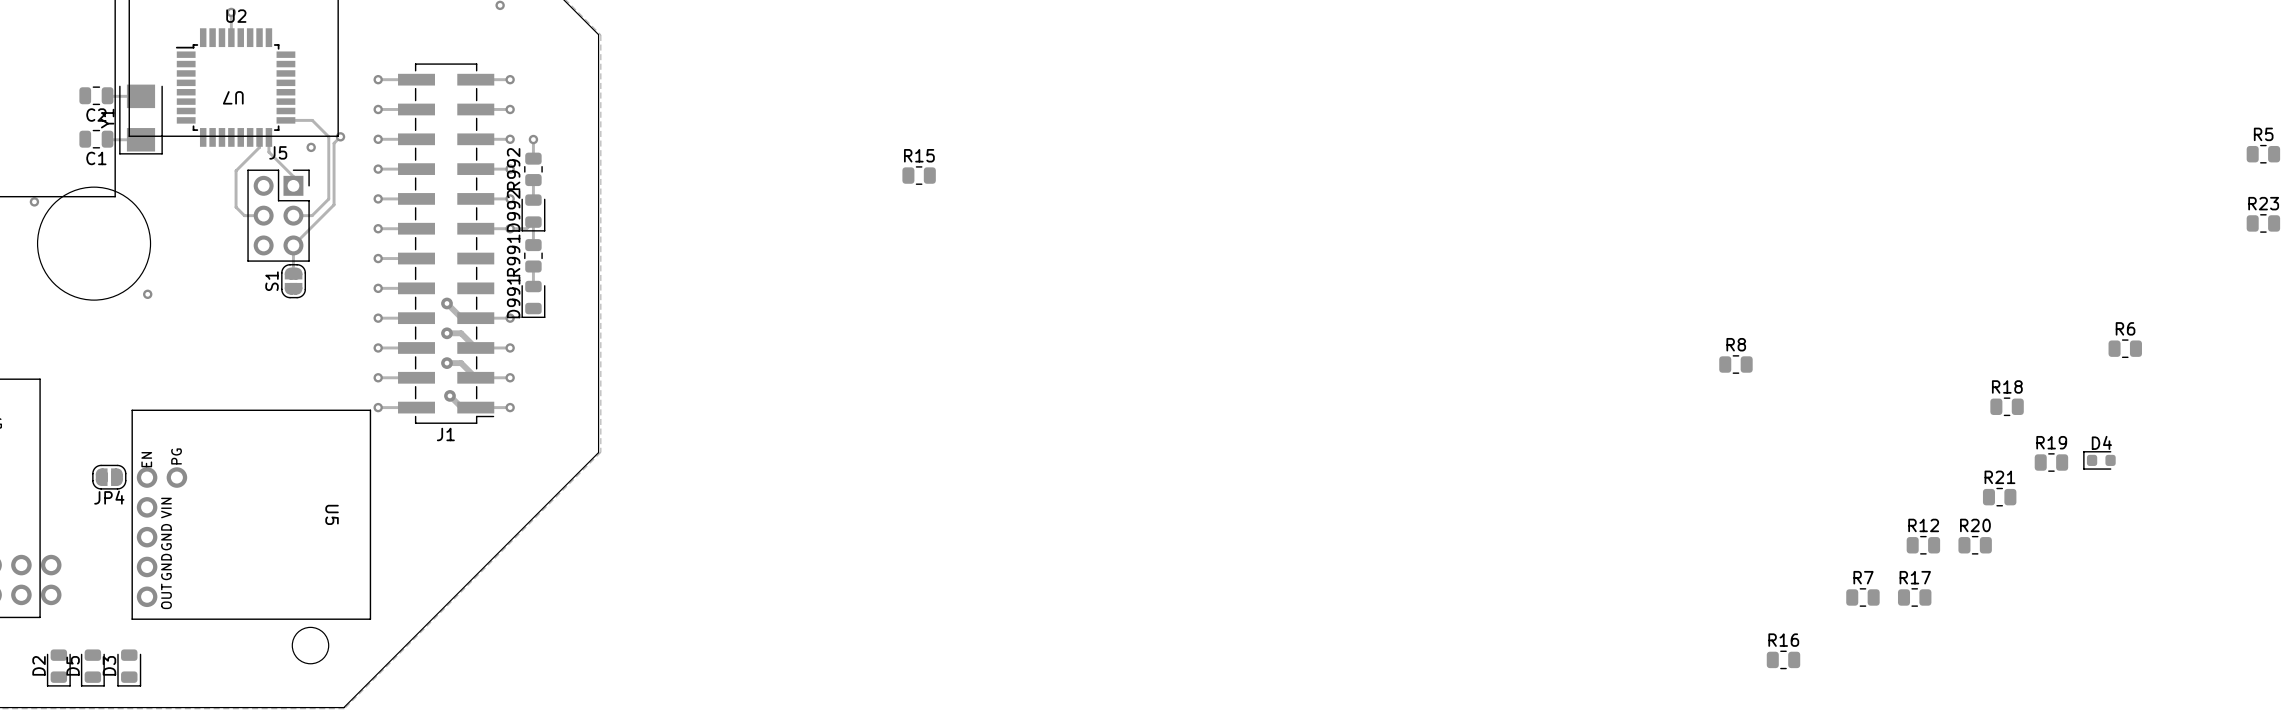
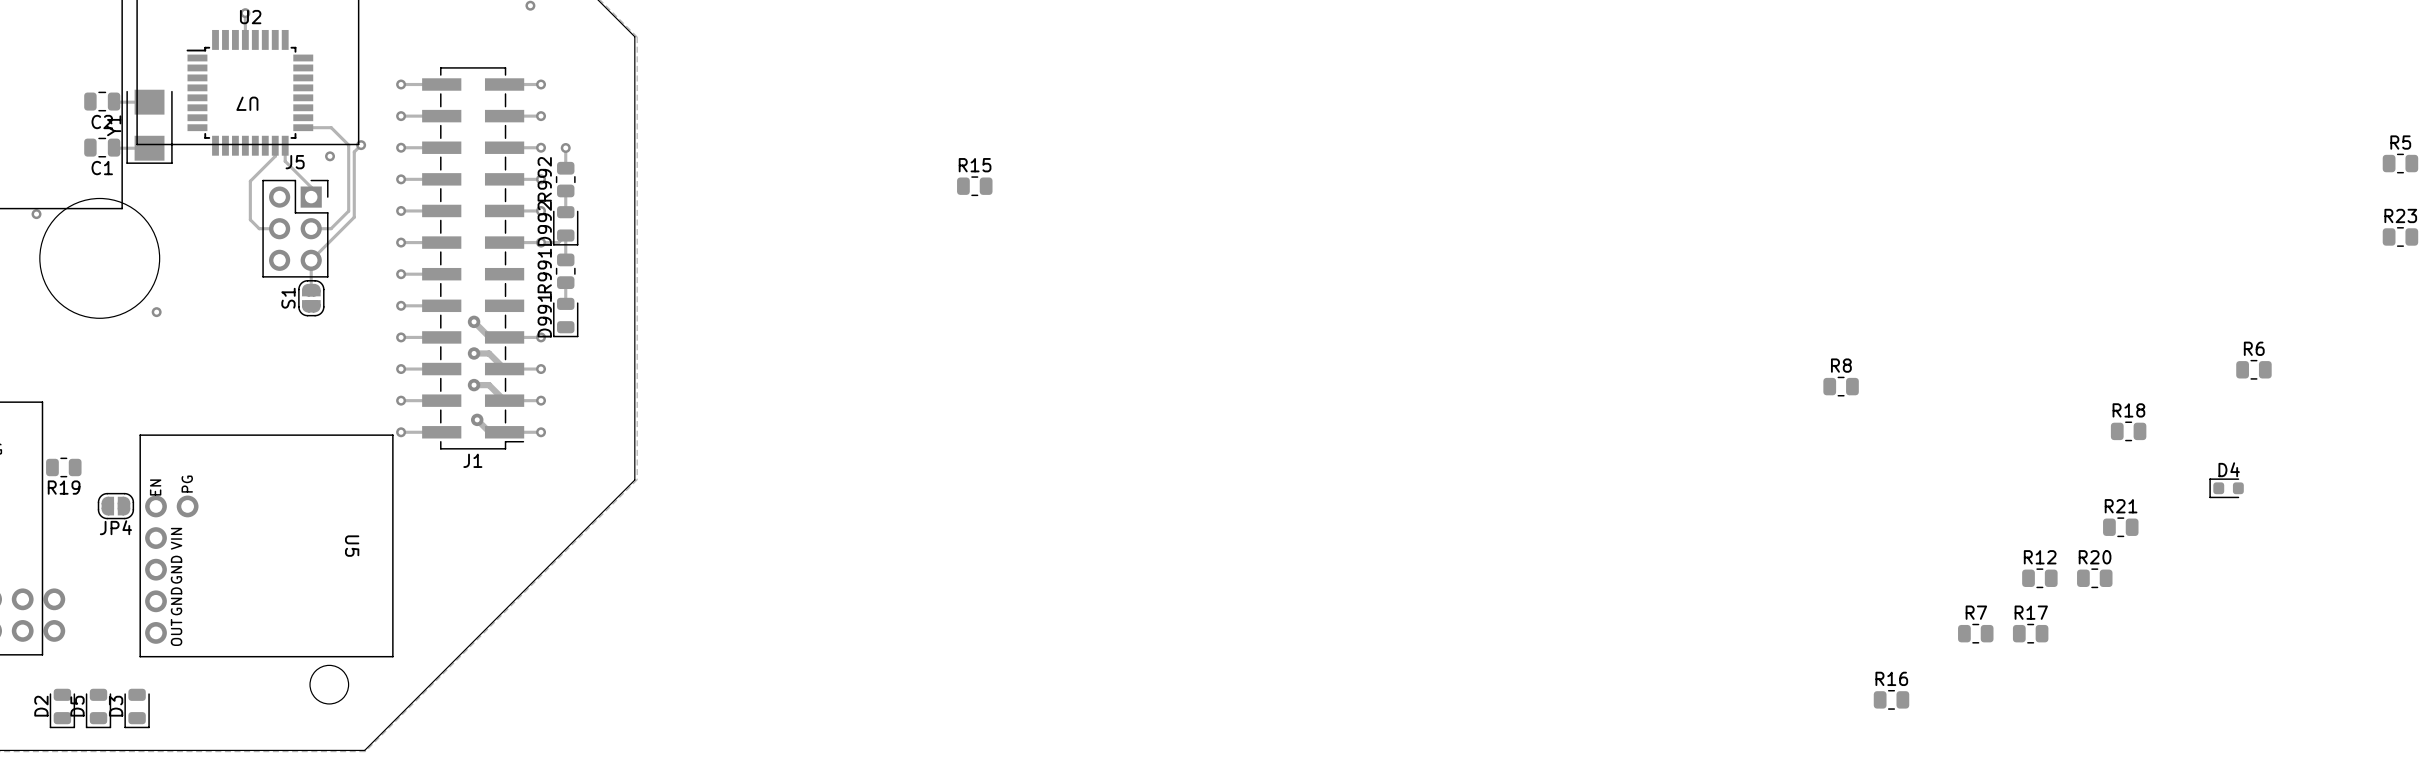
R19 name position: R19 (2051, 442) -> R19 (64, 487)
R19 position: (2051, 462) -> (63, 467)

